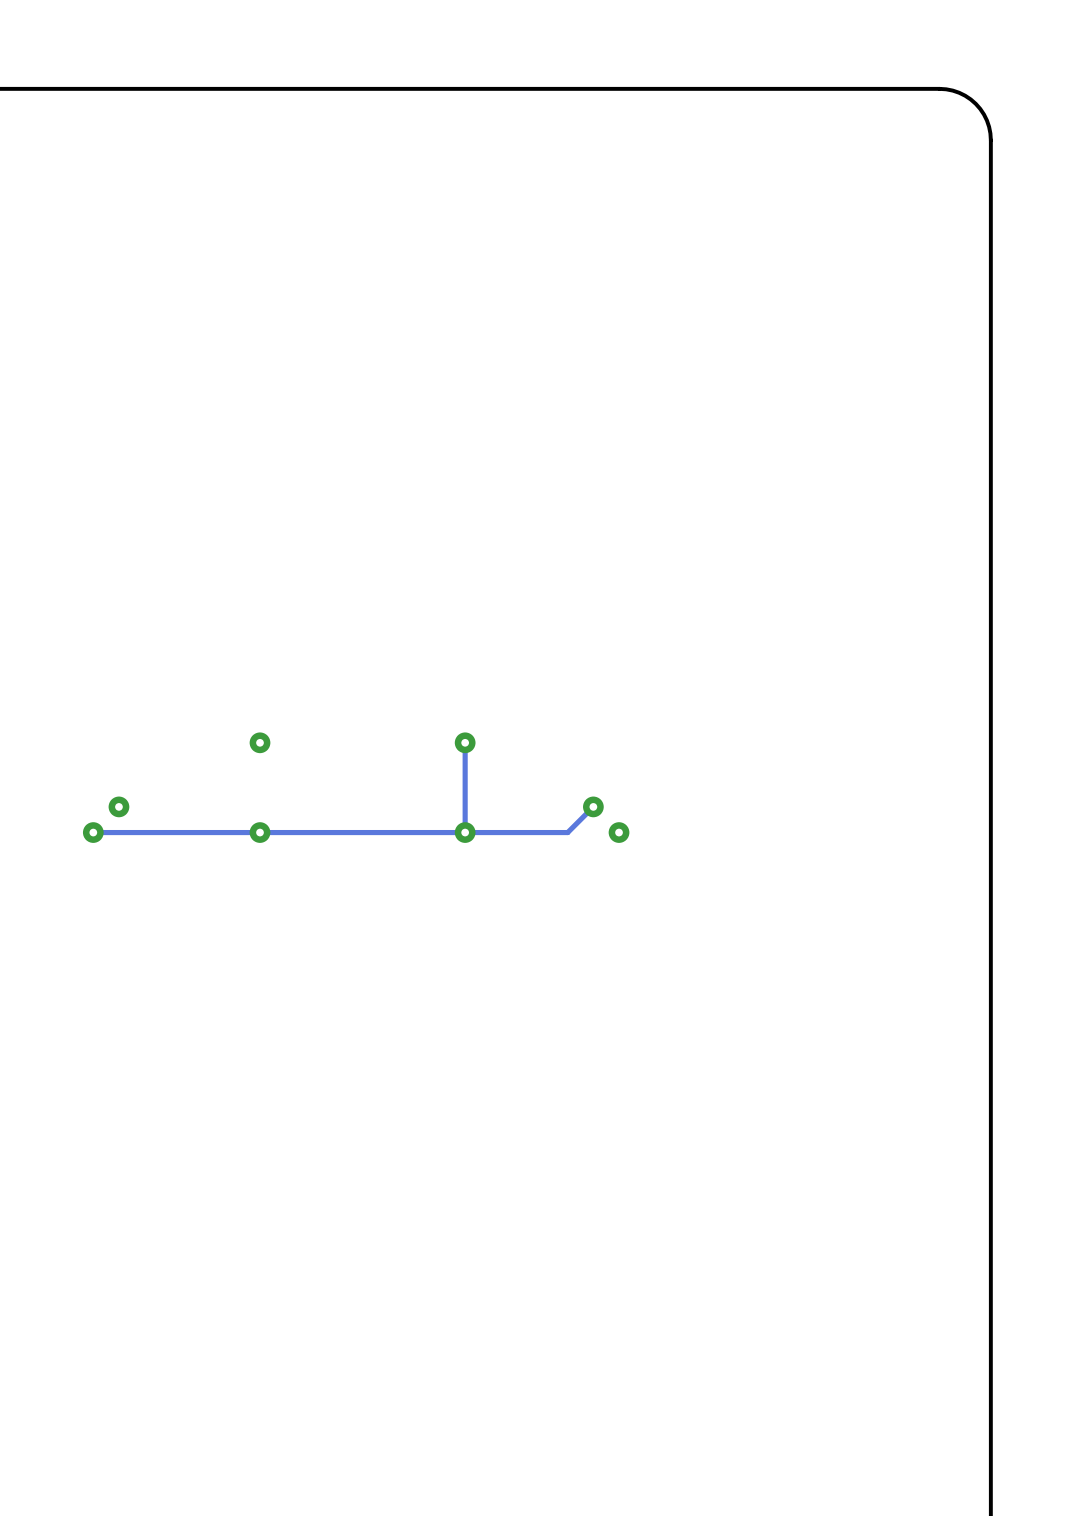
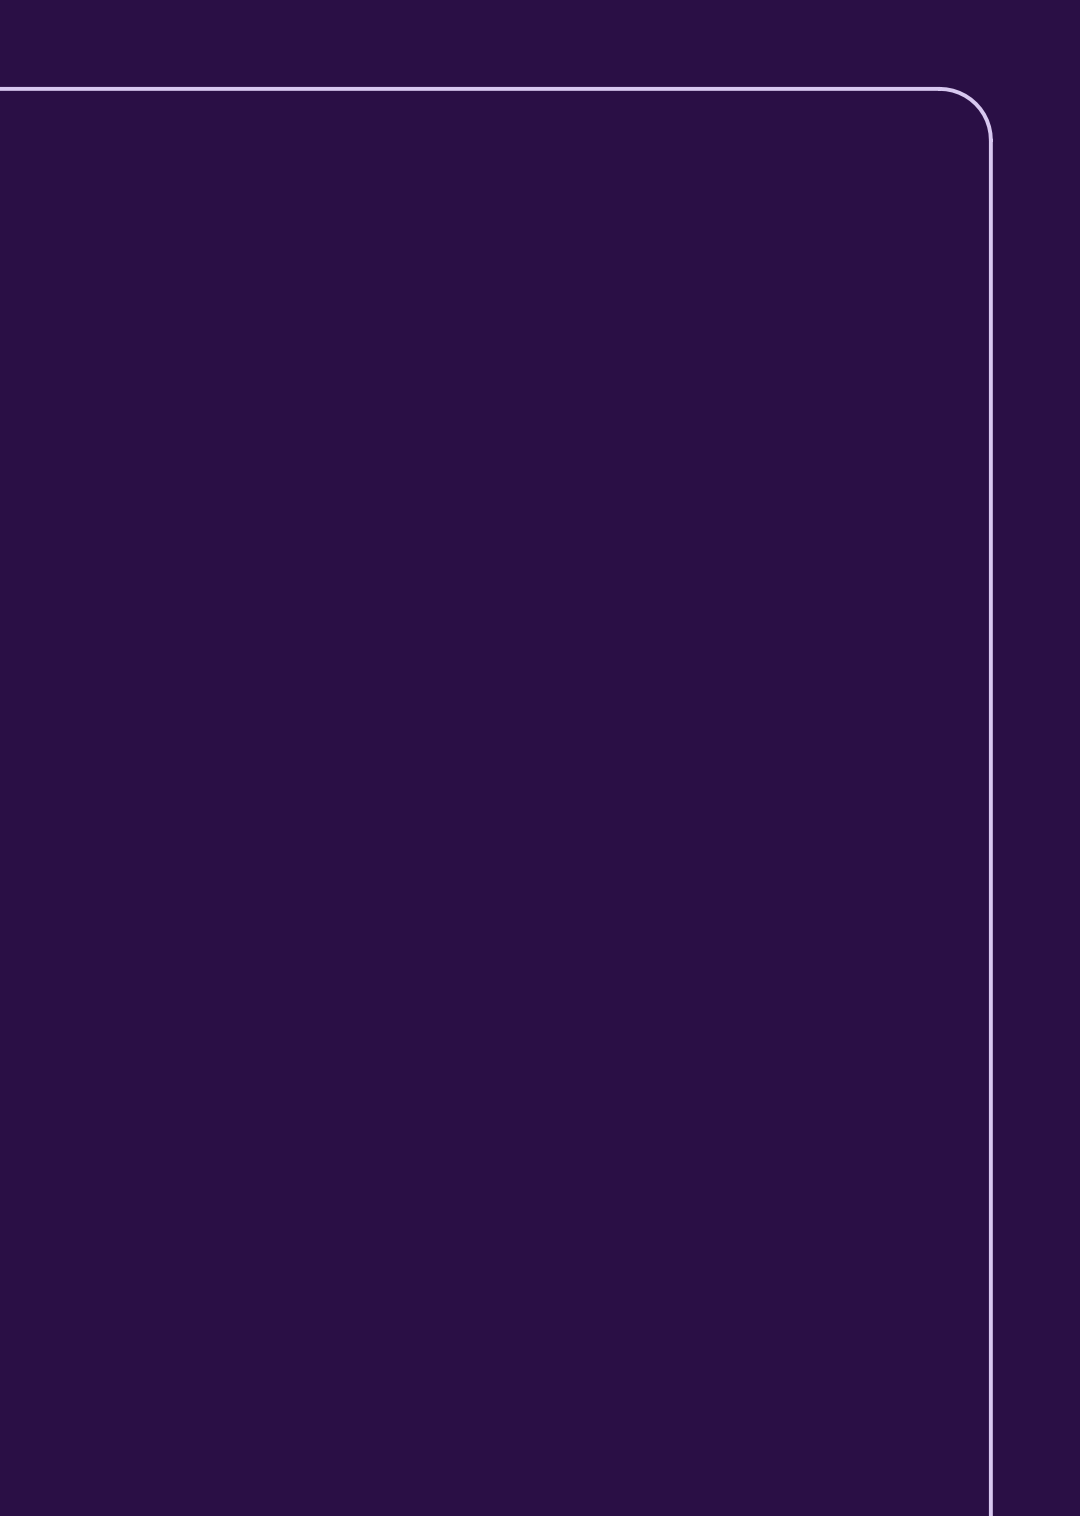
via: (260, 742) -> none
track: (465, 742) (465, 832) -> none
via: (465, 742) -> none
via: (118, 806) -> none
track: (593, 806) (567, 832) (93, 832) -> none
via: (593, 806) -> none
via: (93, 832) -> none
via: (260, 832) -> none
via: (465, 832) -> none
via: (619, 832) -> none

